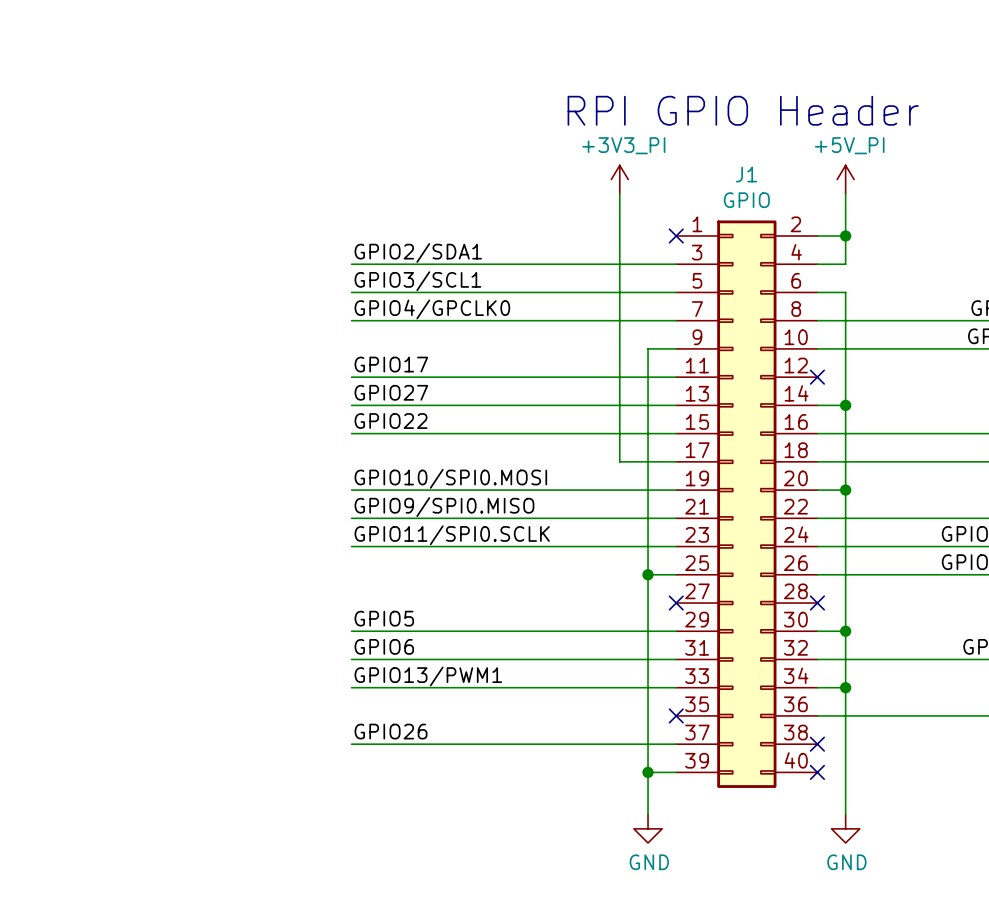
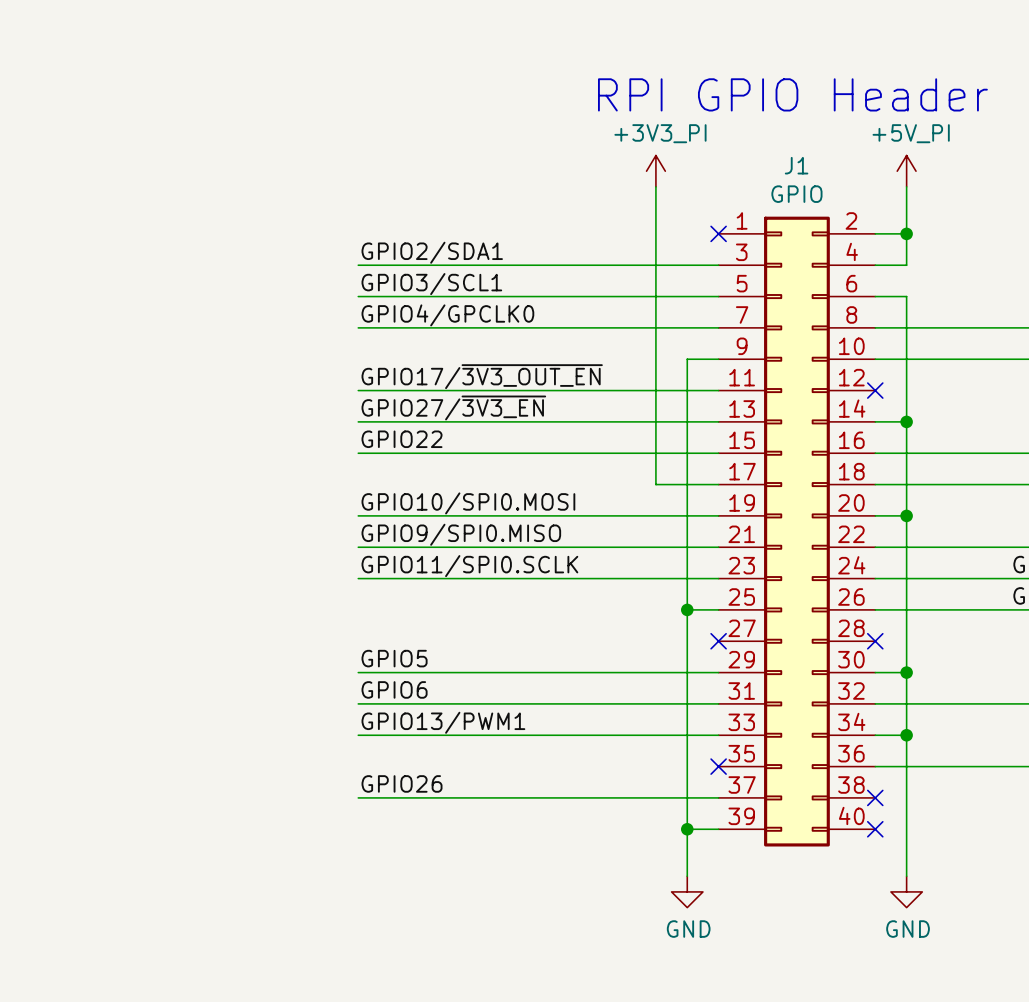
label: GPIO17 (391, 364) -> GPIO17/~{3V3_OUT_EN} (482, 376)
label: GPIO27 (391, 392) -> GPIO27/~{3V3_EN} (453, 407)

